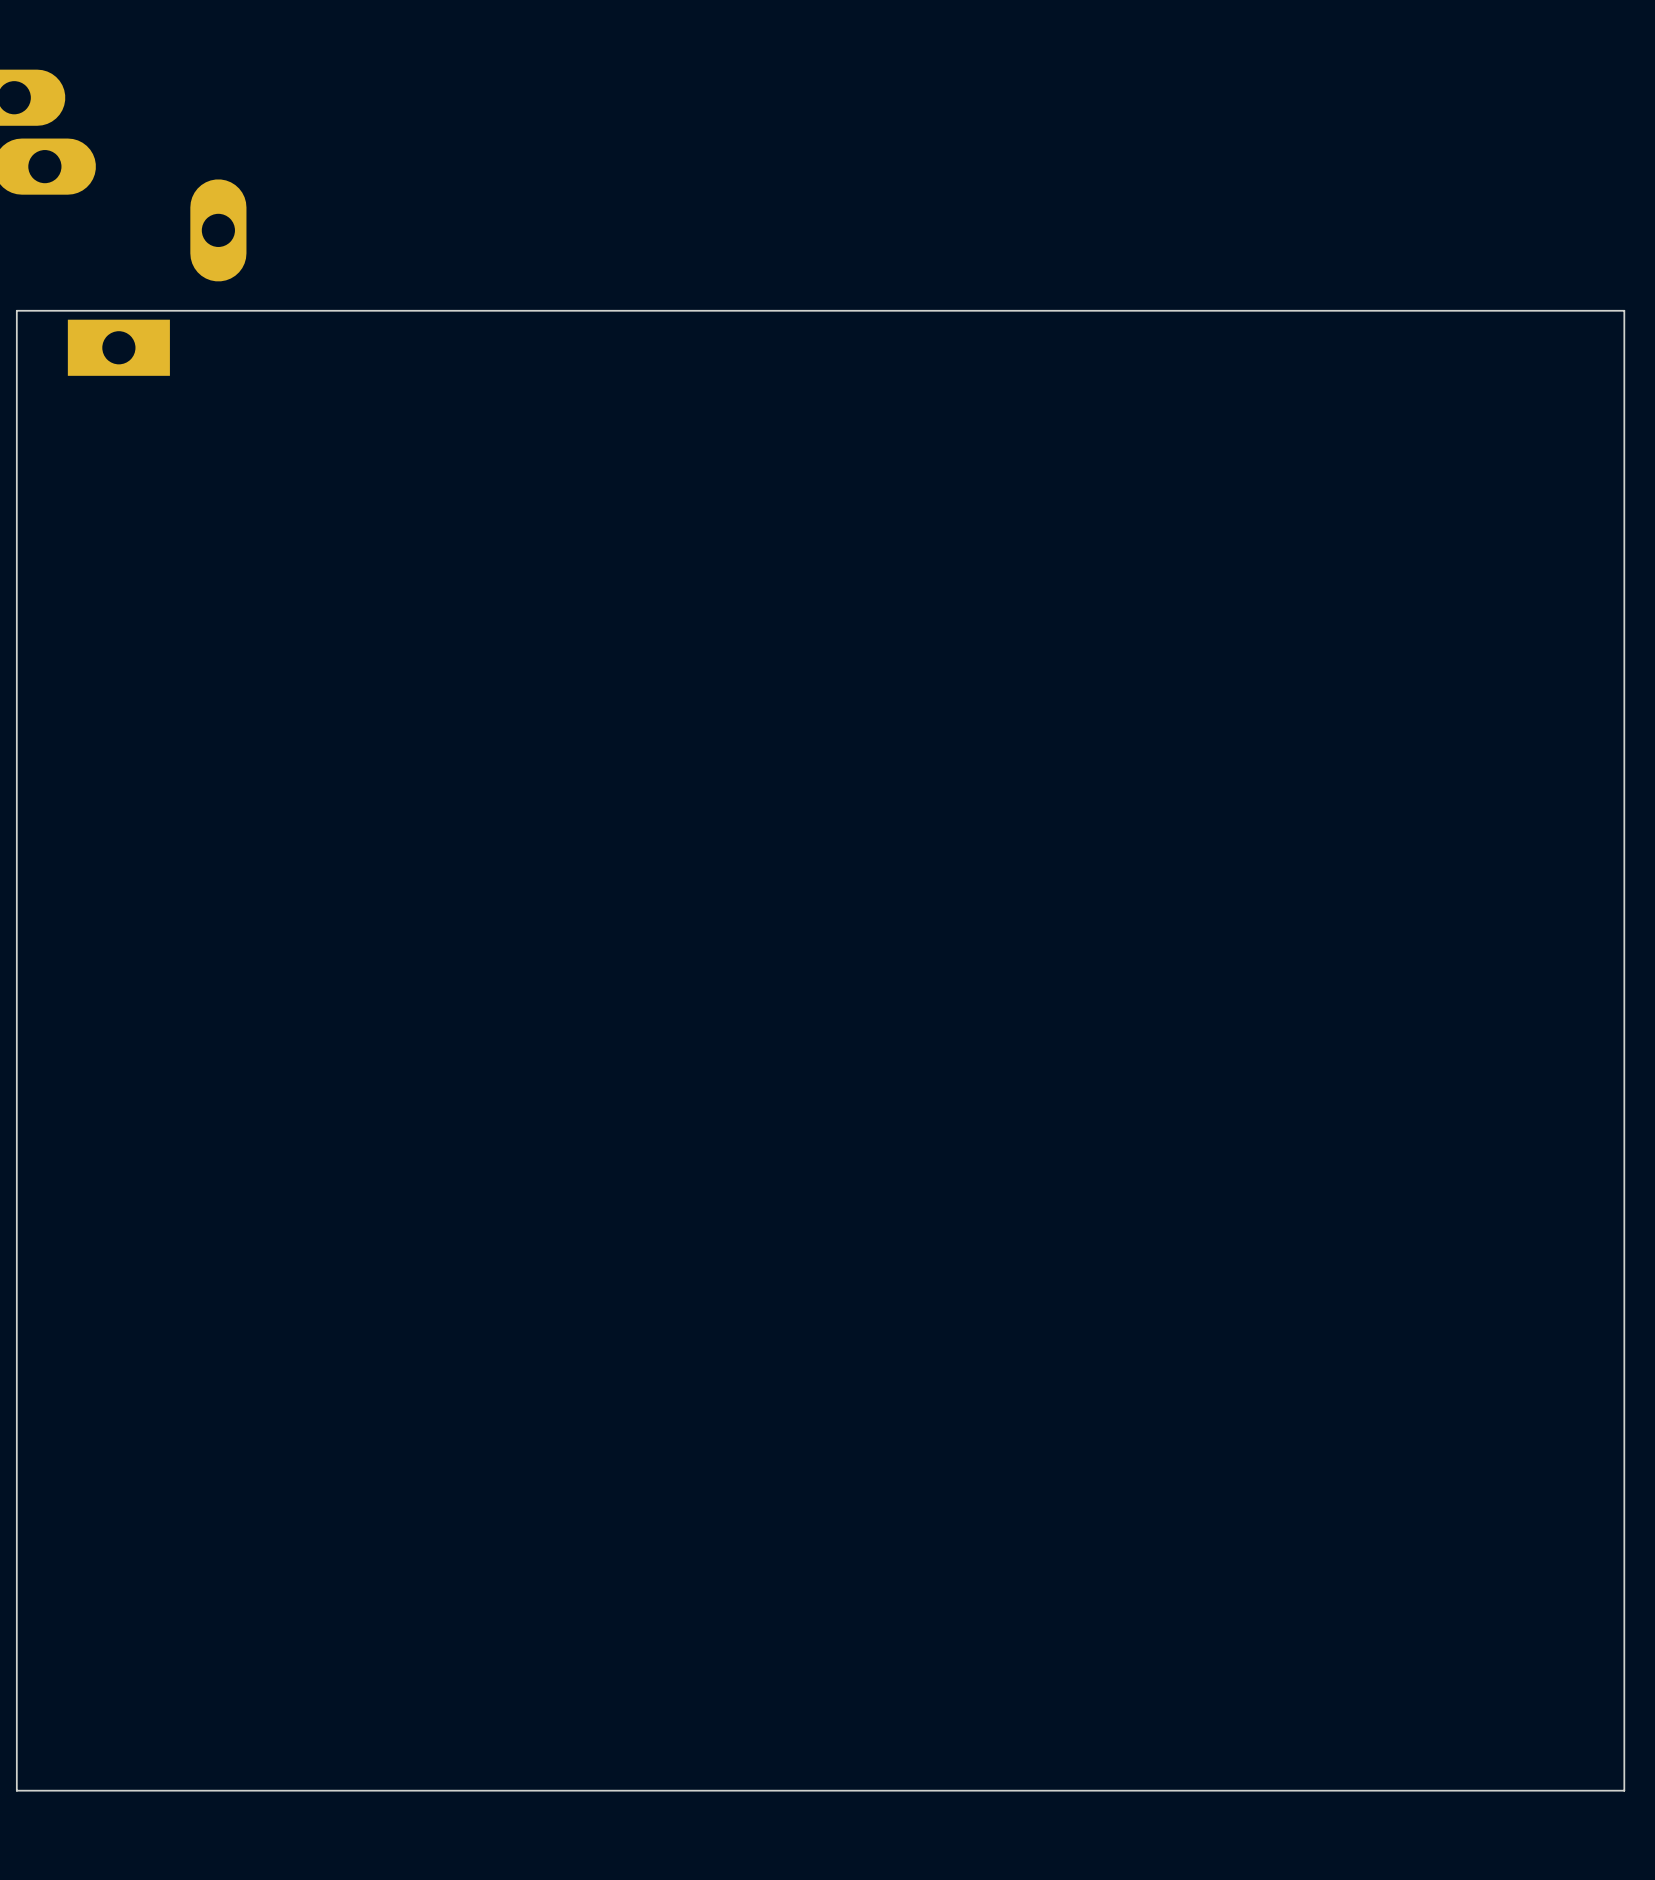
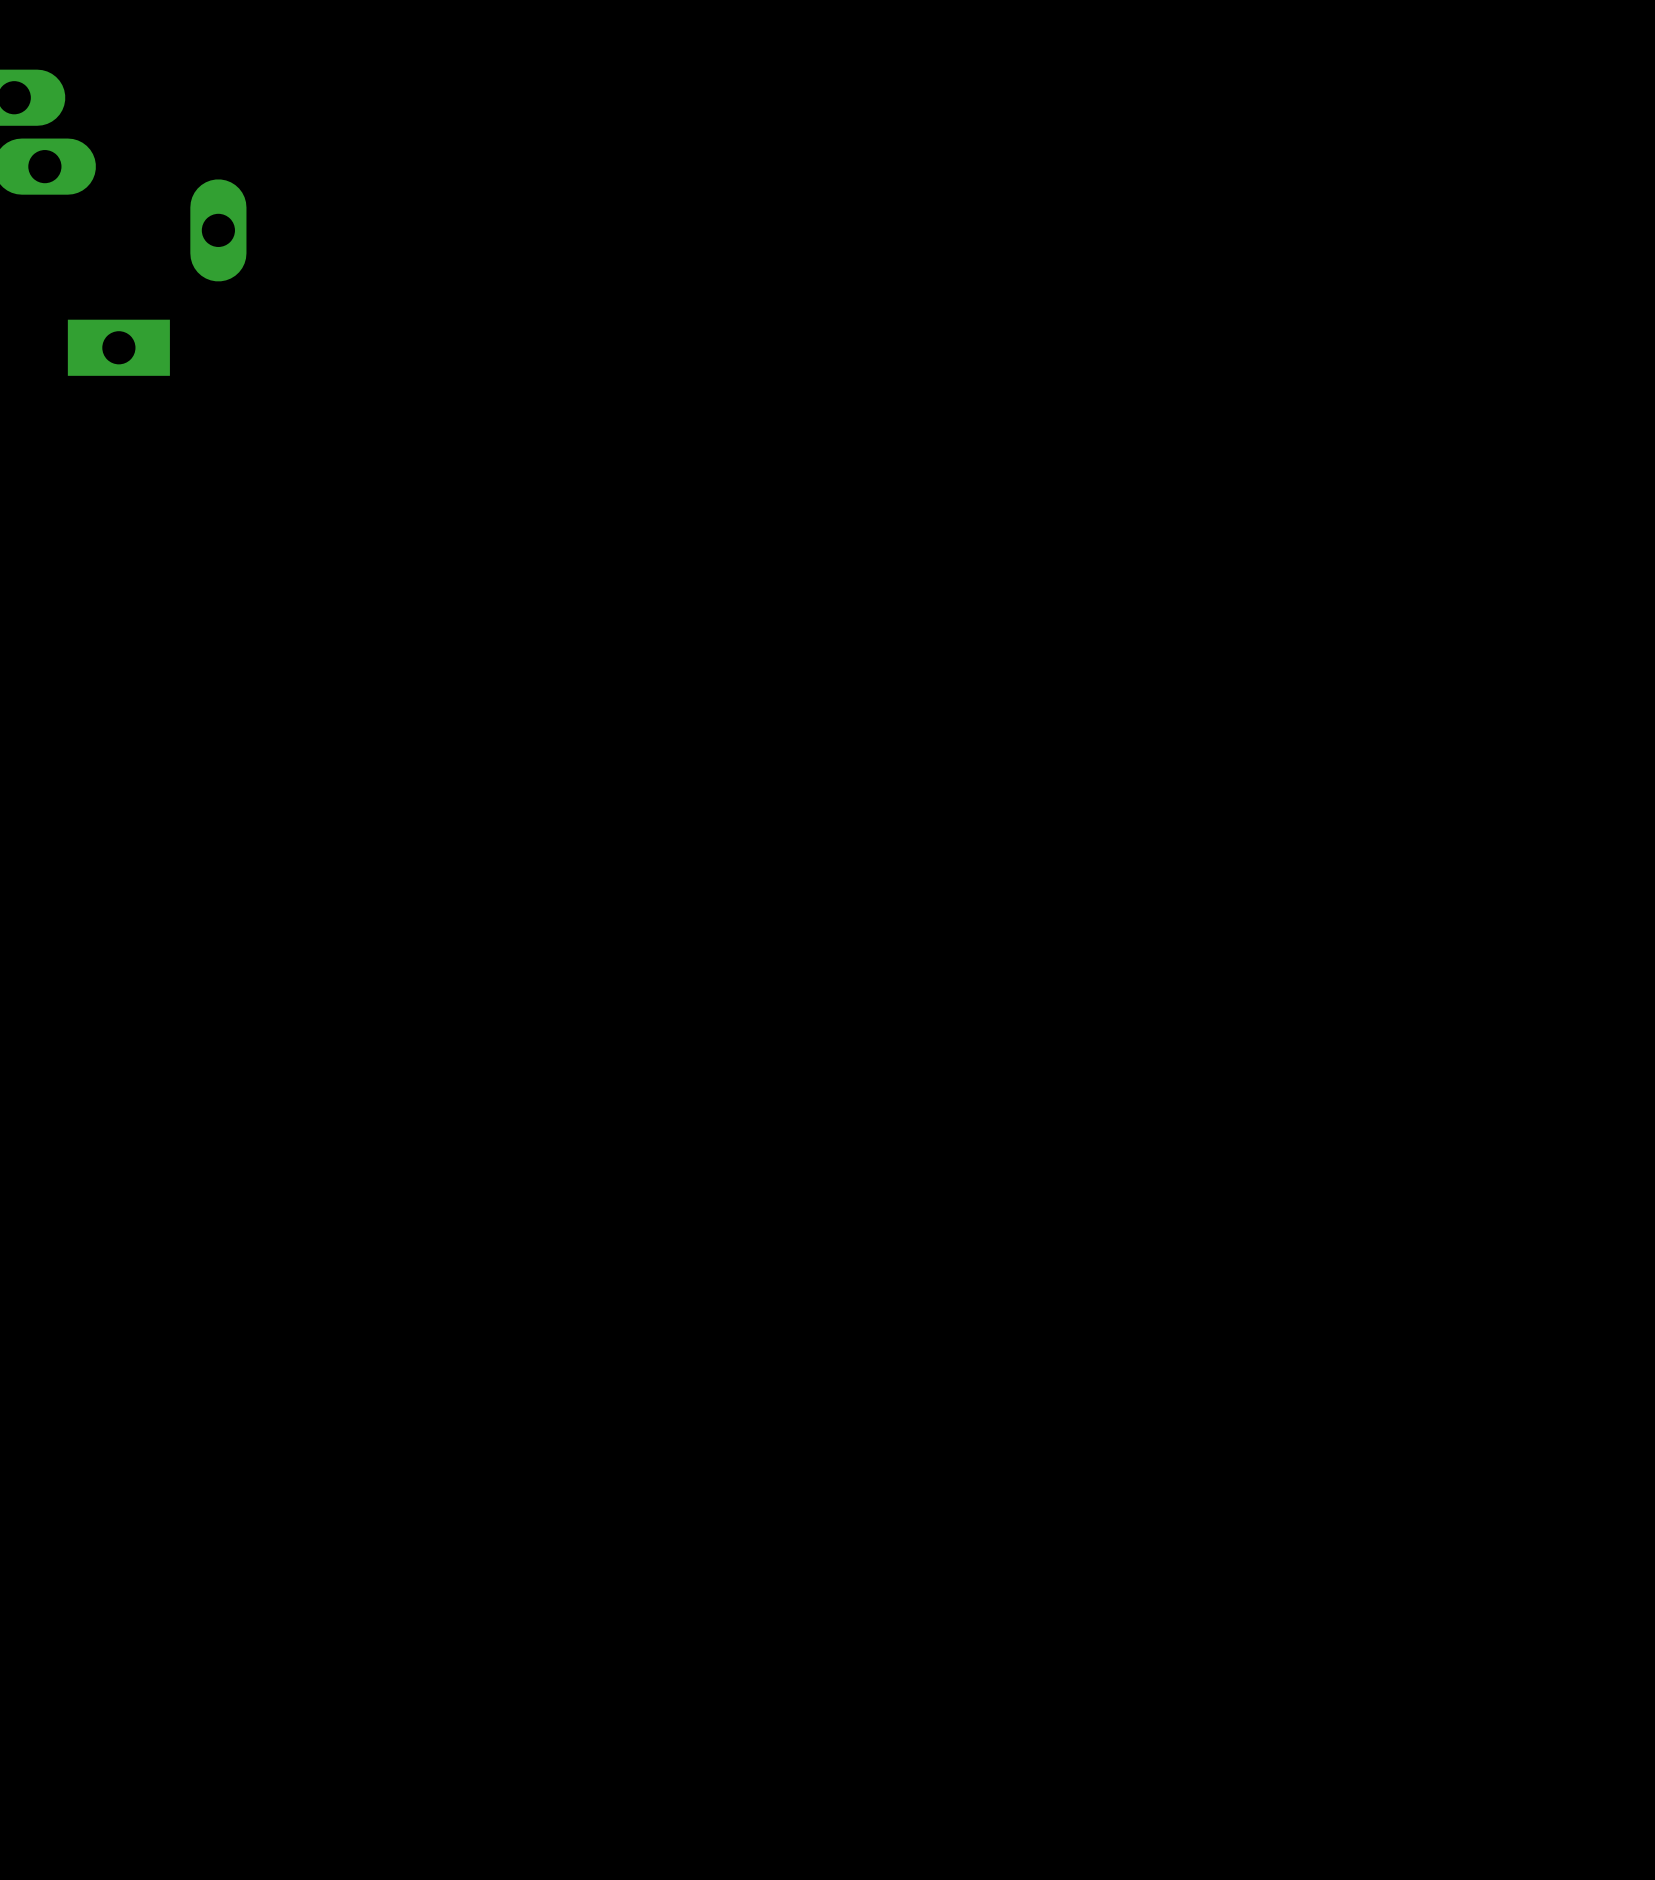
board edge: (1624, 310) (16, 310) (16, 1790) (1624, 1790) (1624, 310) -> none

